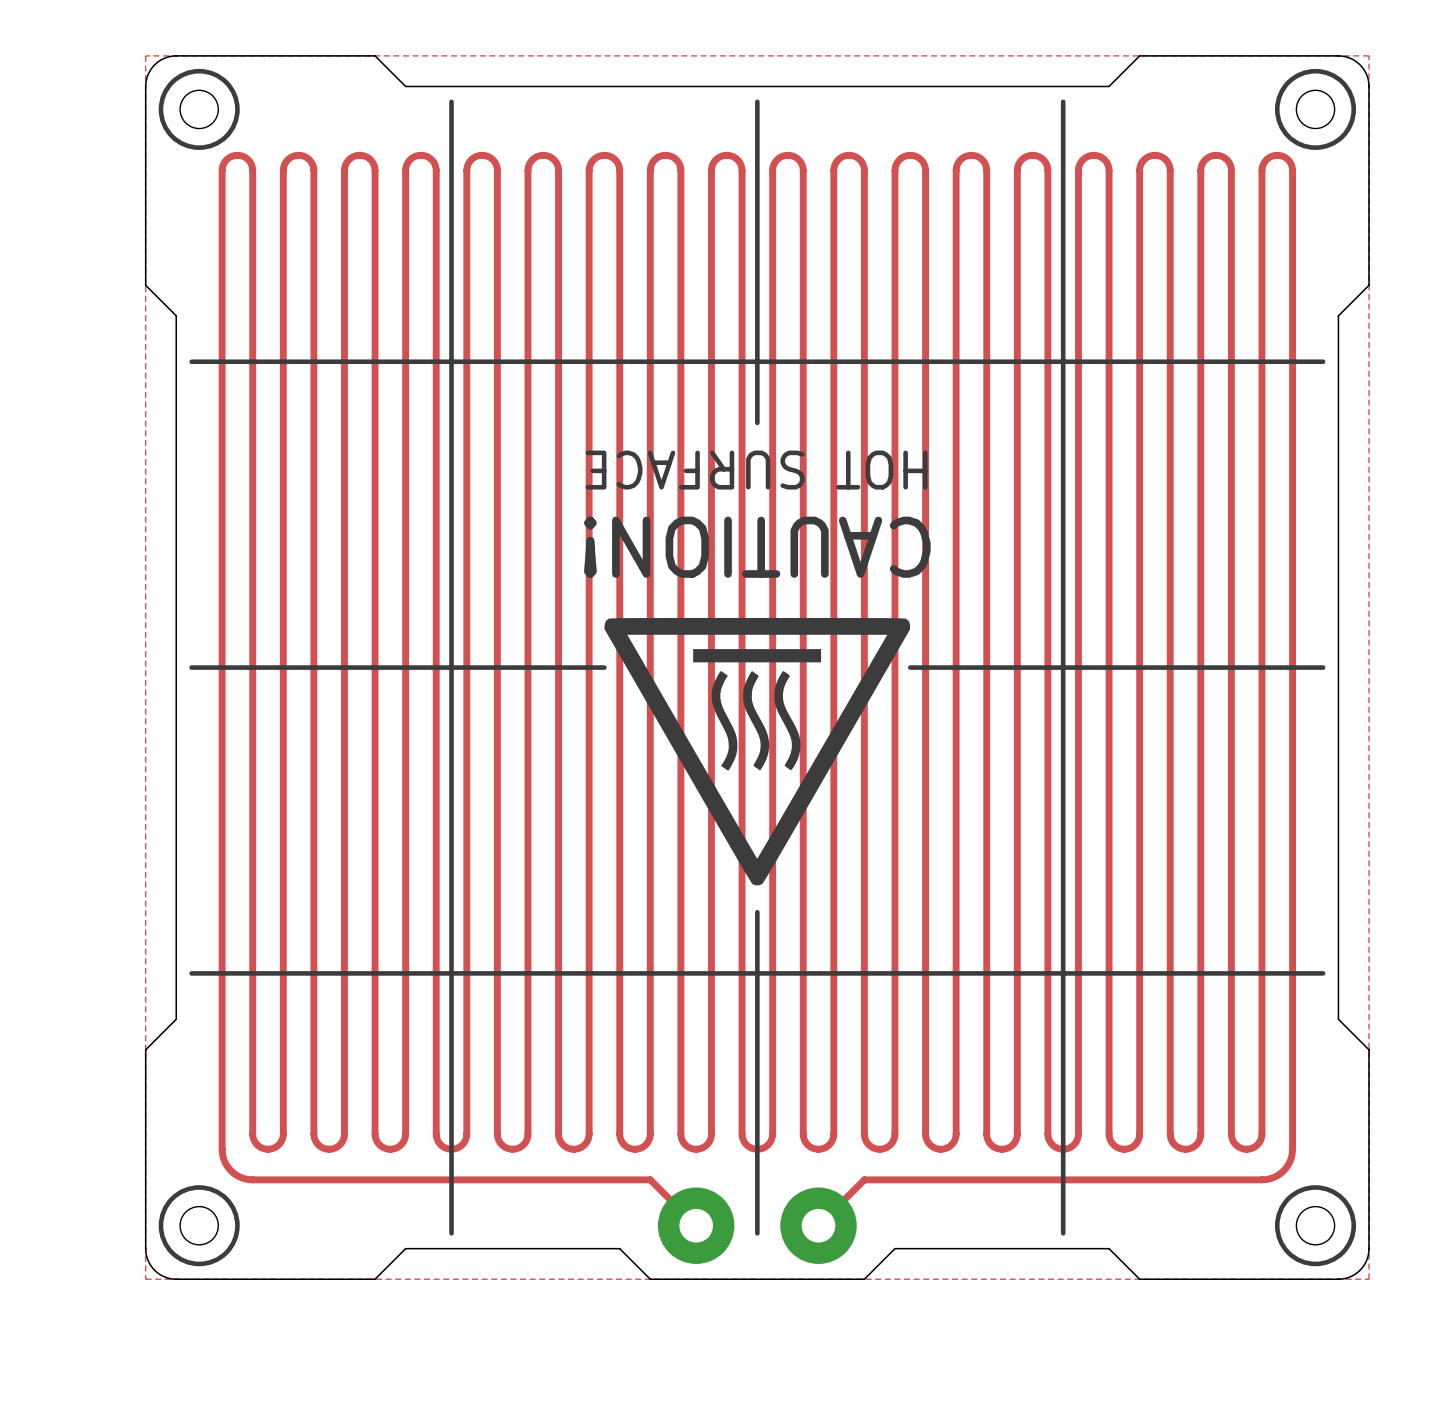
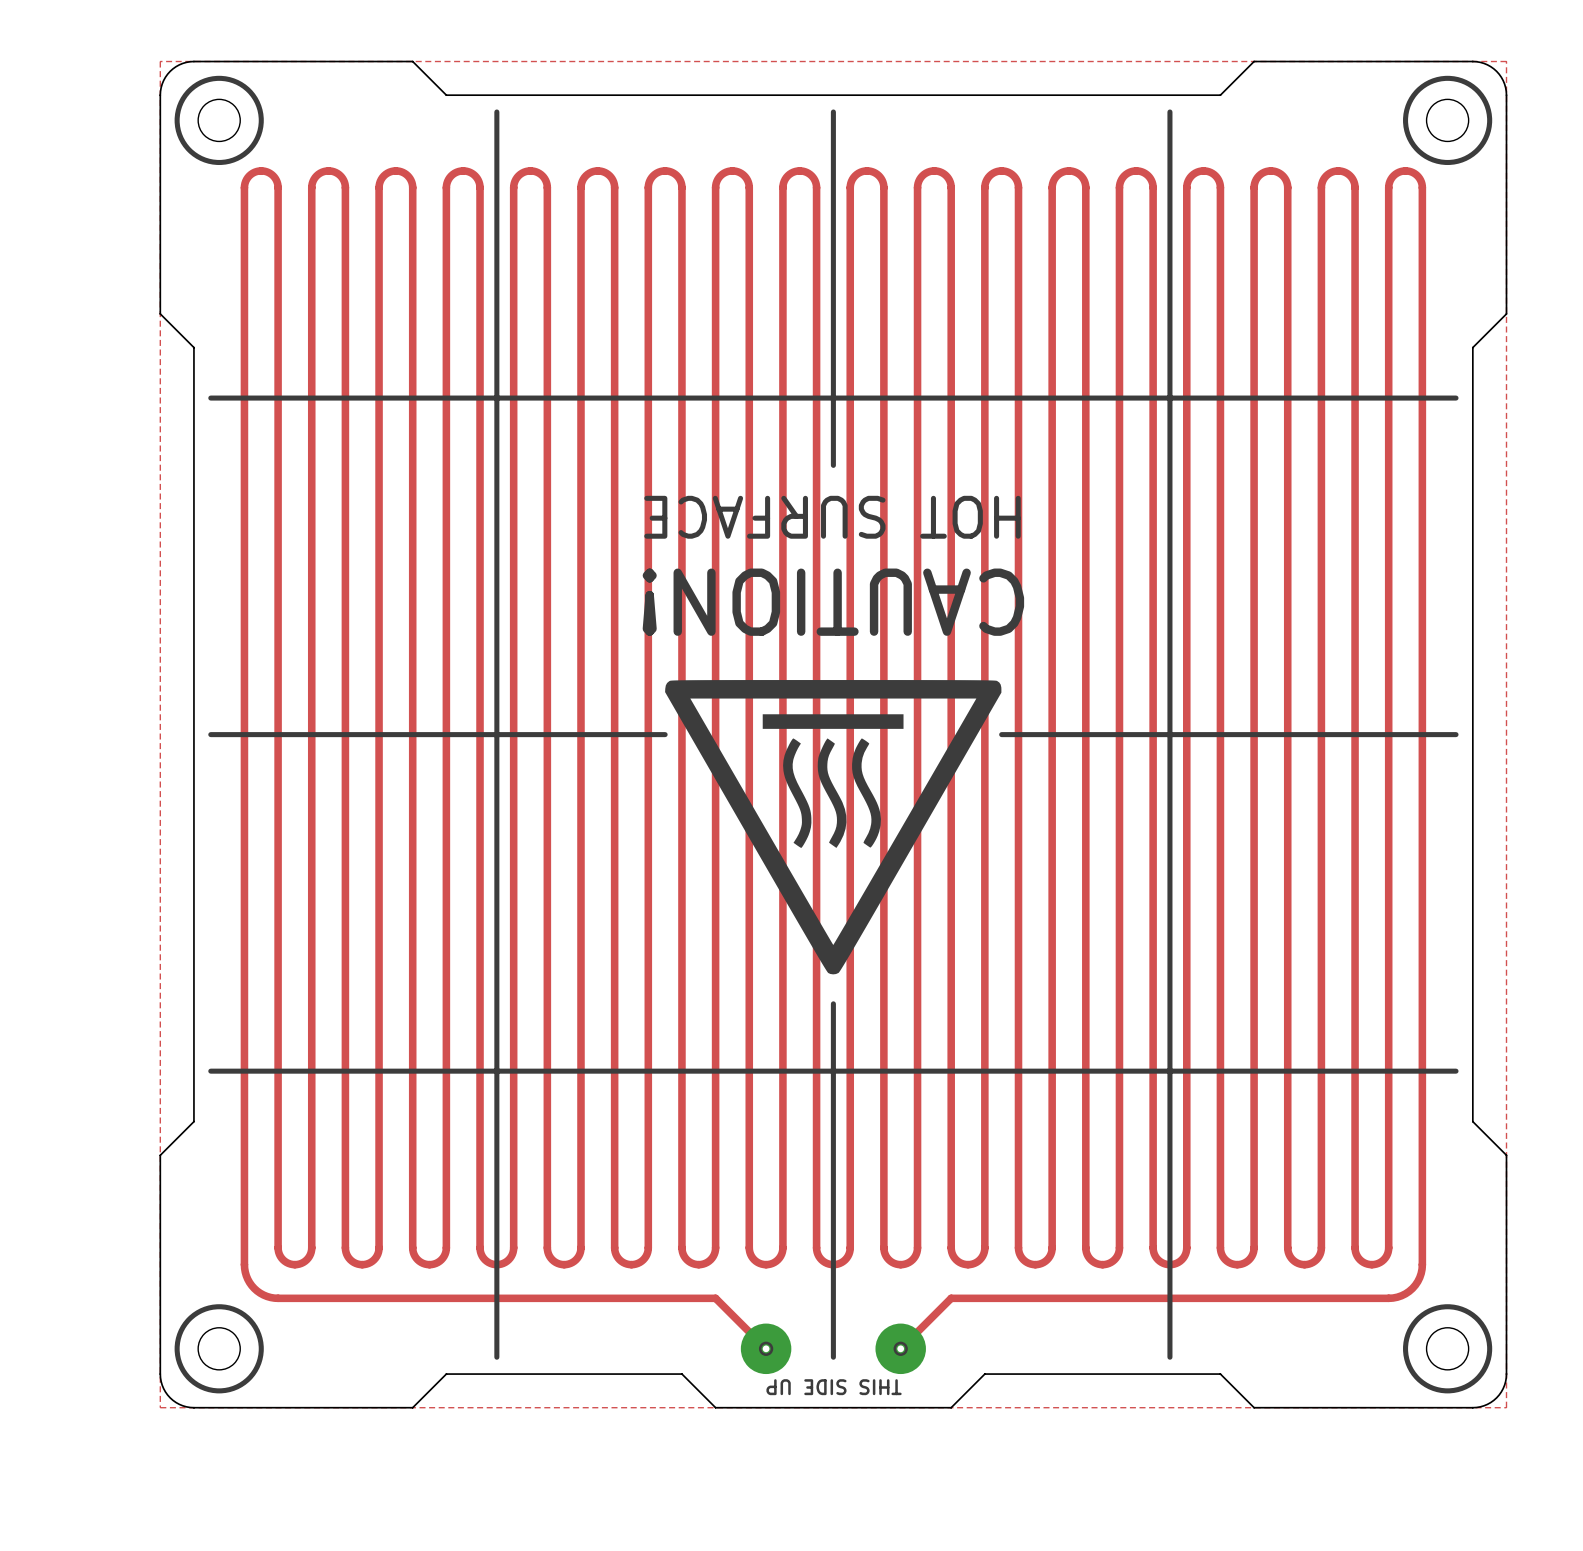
part footprint: [657, 1187, 735, 1264] -> [740, 1323, 792, 1375]
part footprint: [780, 1187, 857, 1264] -> [875, 1323, 926, 1375]
text: none -> THIS SIDE UP (834, 1387)

